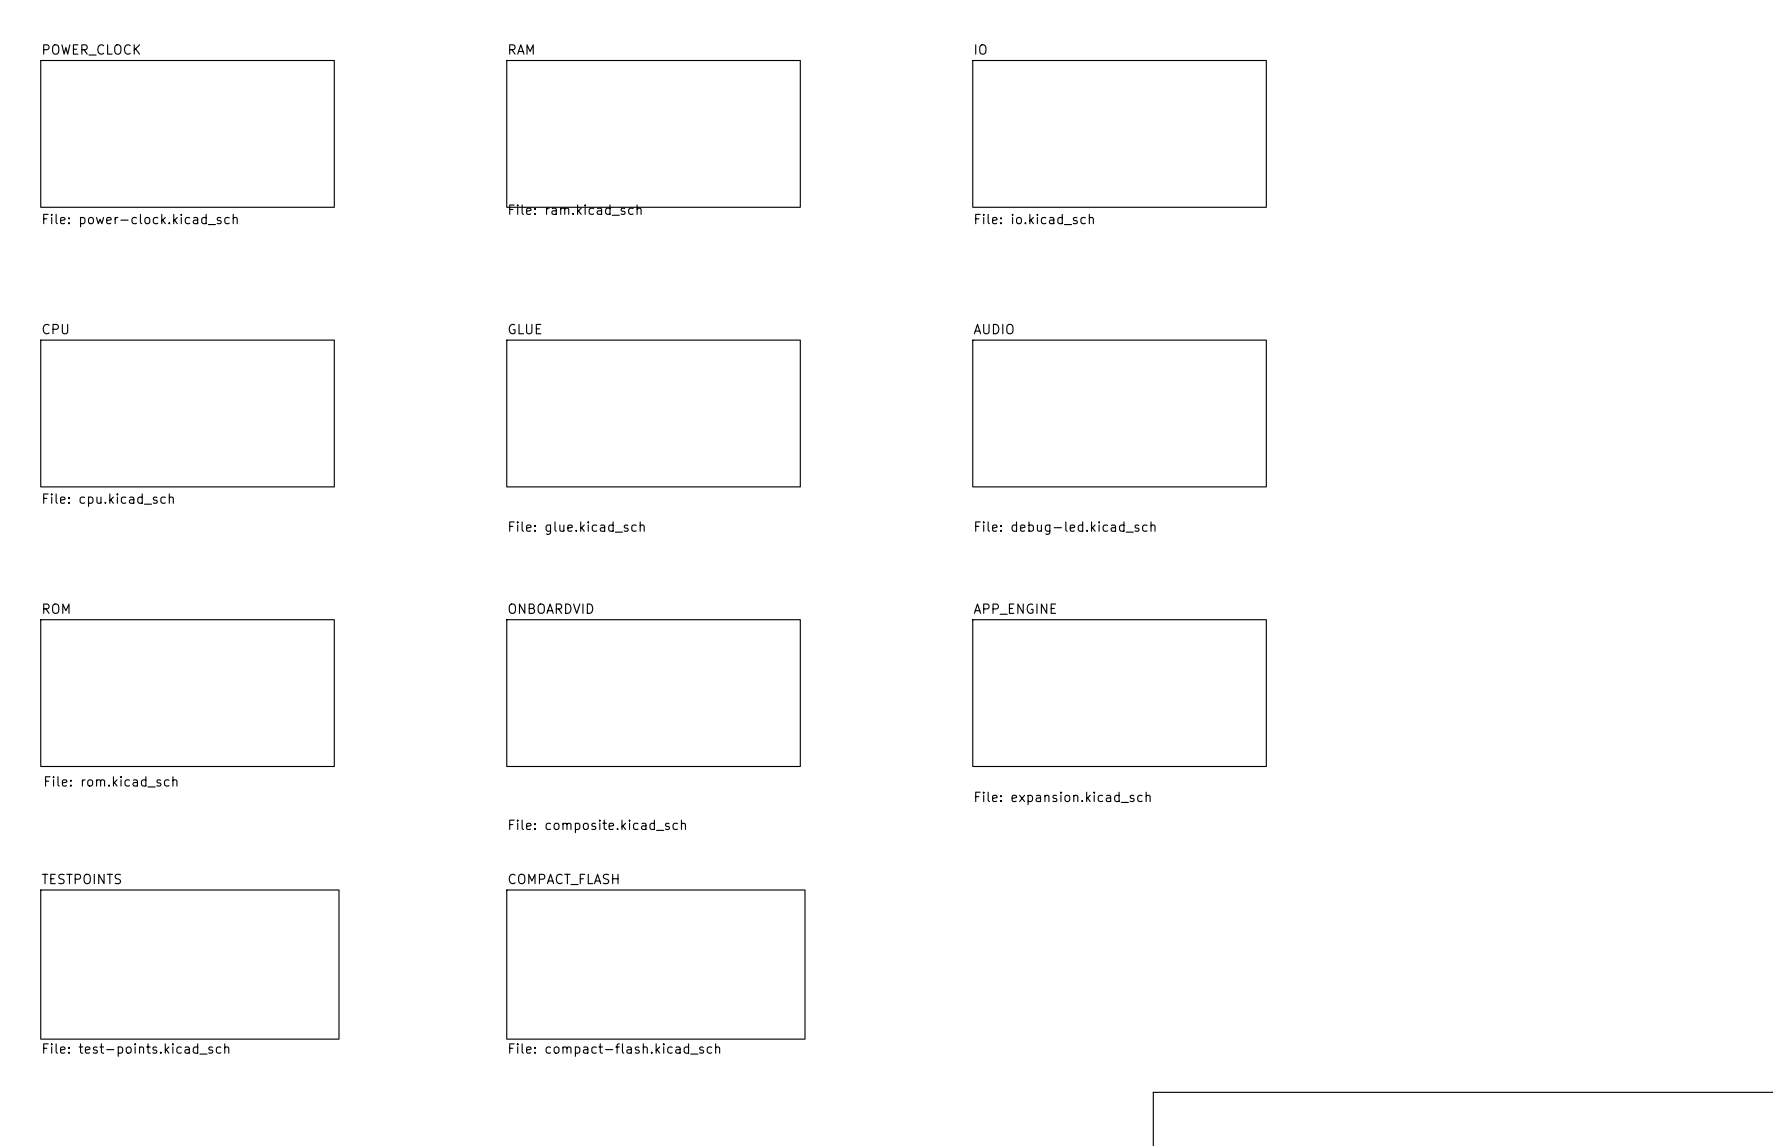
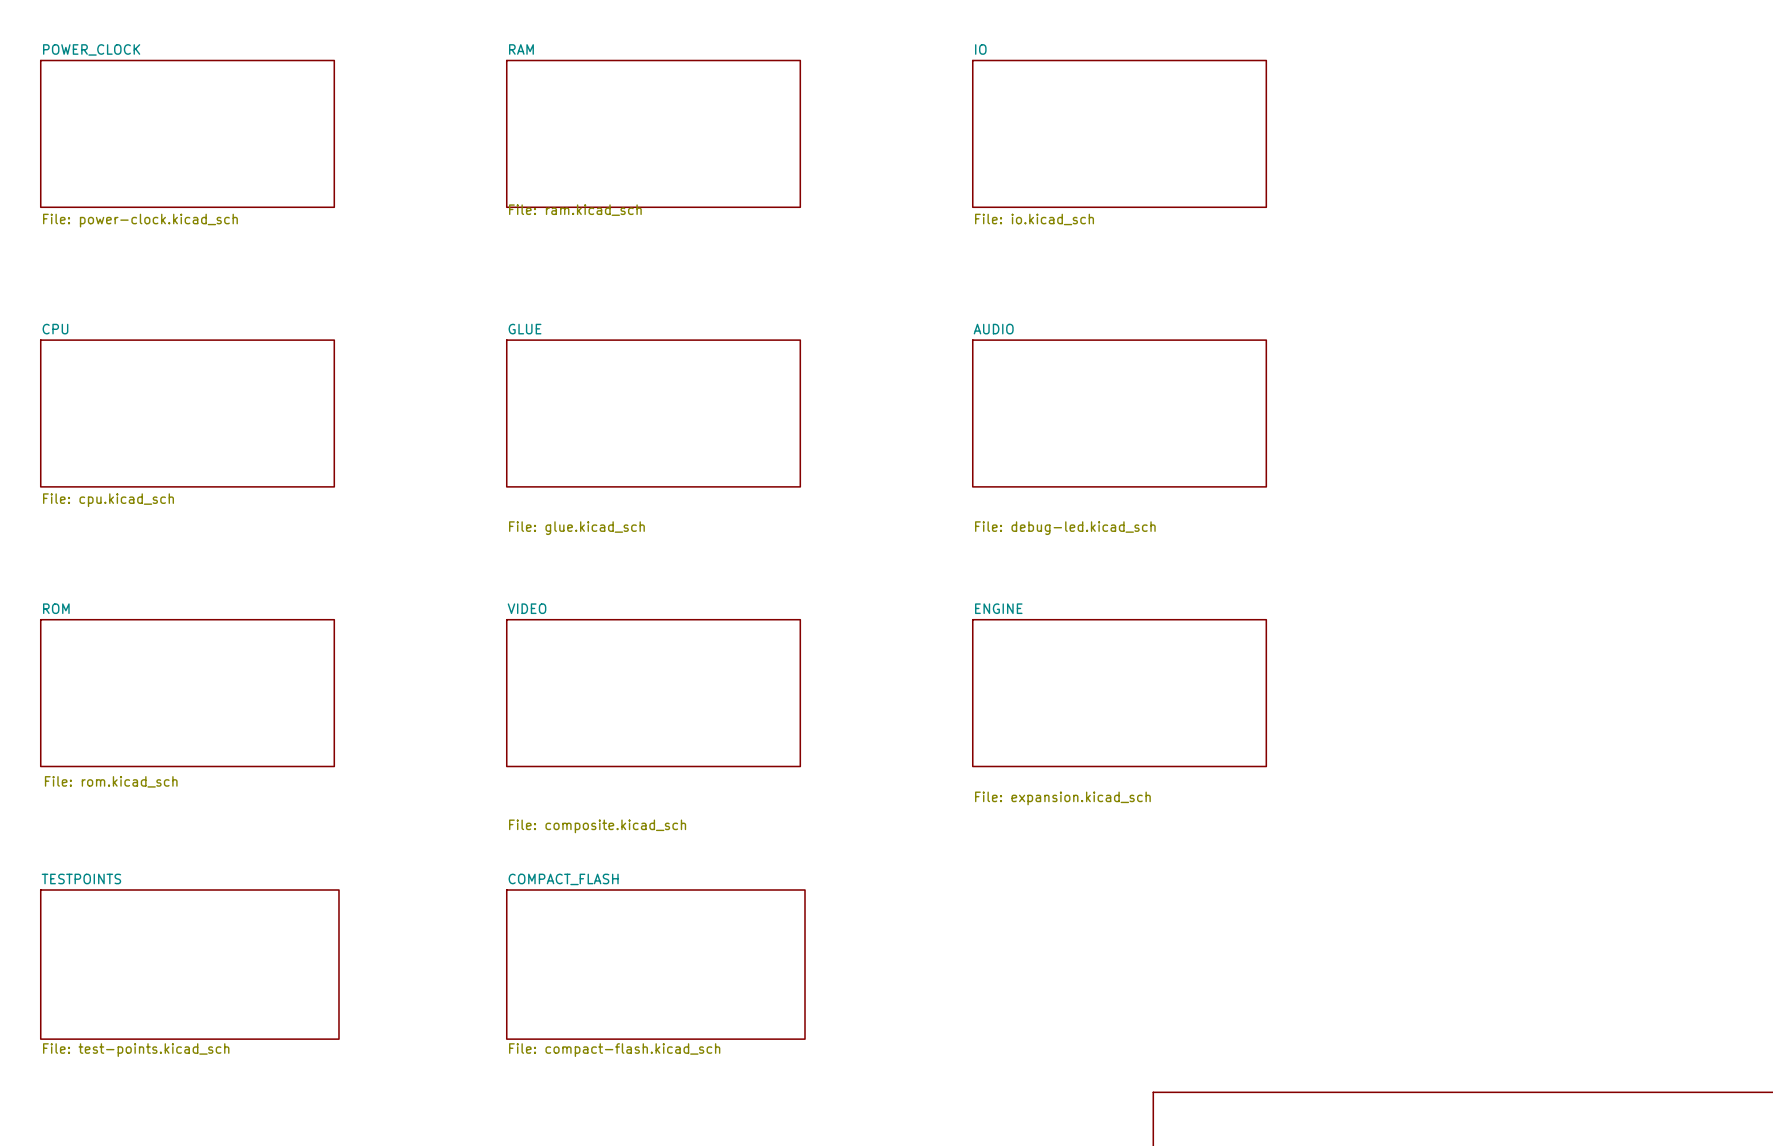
sheet ONBOARDVID name: ONBOARDVID (550, 608) -> VIDEO (527, 608)
sheet APP_ENGINE name: APP_ENGINE (1014, 609) -> ENGINE (998, 608)

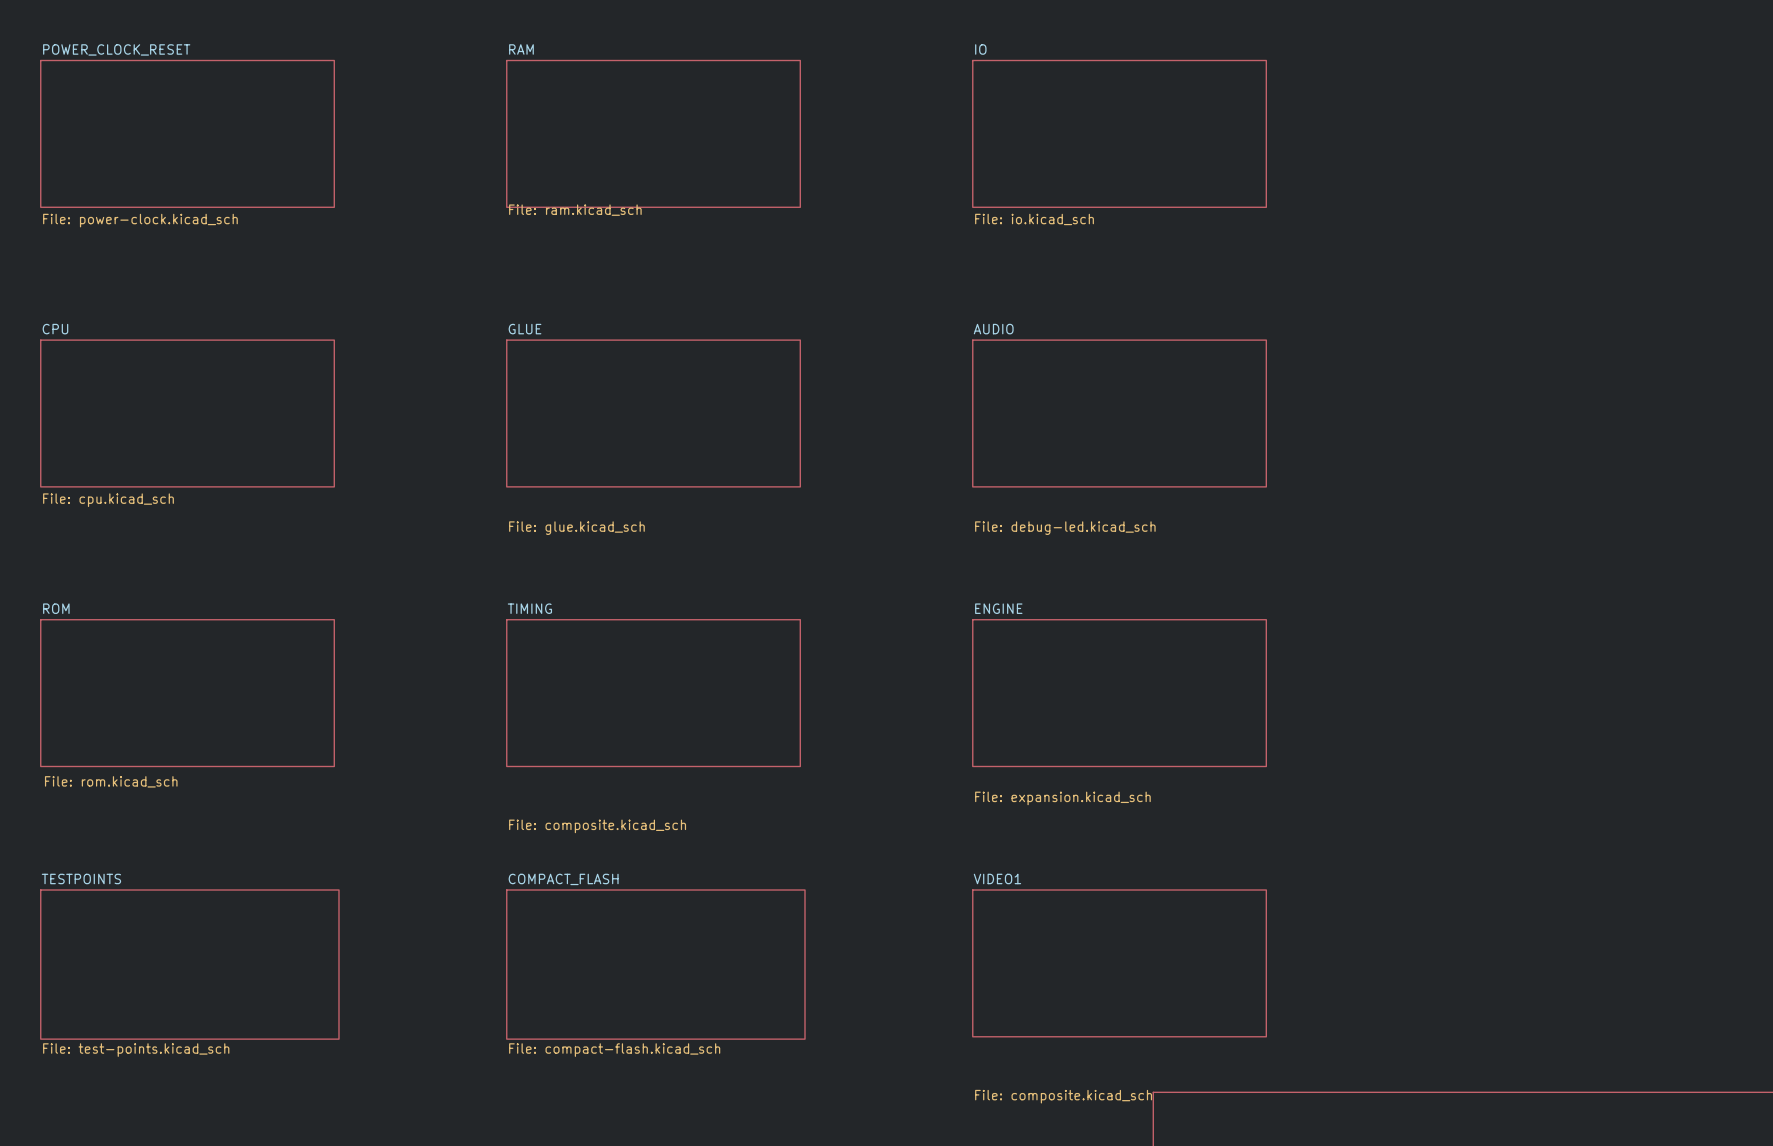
sheet POWER_CLOCK name: POWER_CLOCK (91, 49) -> POWER_CLOCK_RESET (116, 49)
sheet VIDEO name: VIDEO (527, 608) -> TIMING (529, 608)
sheet VIDEO1: none -> File: composite.kicad_sch (1119, 963)

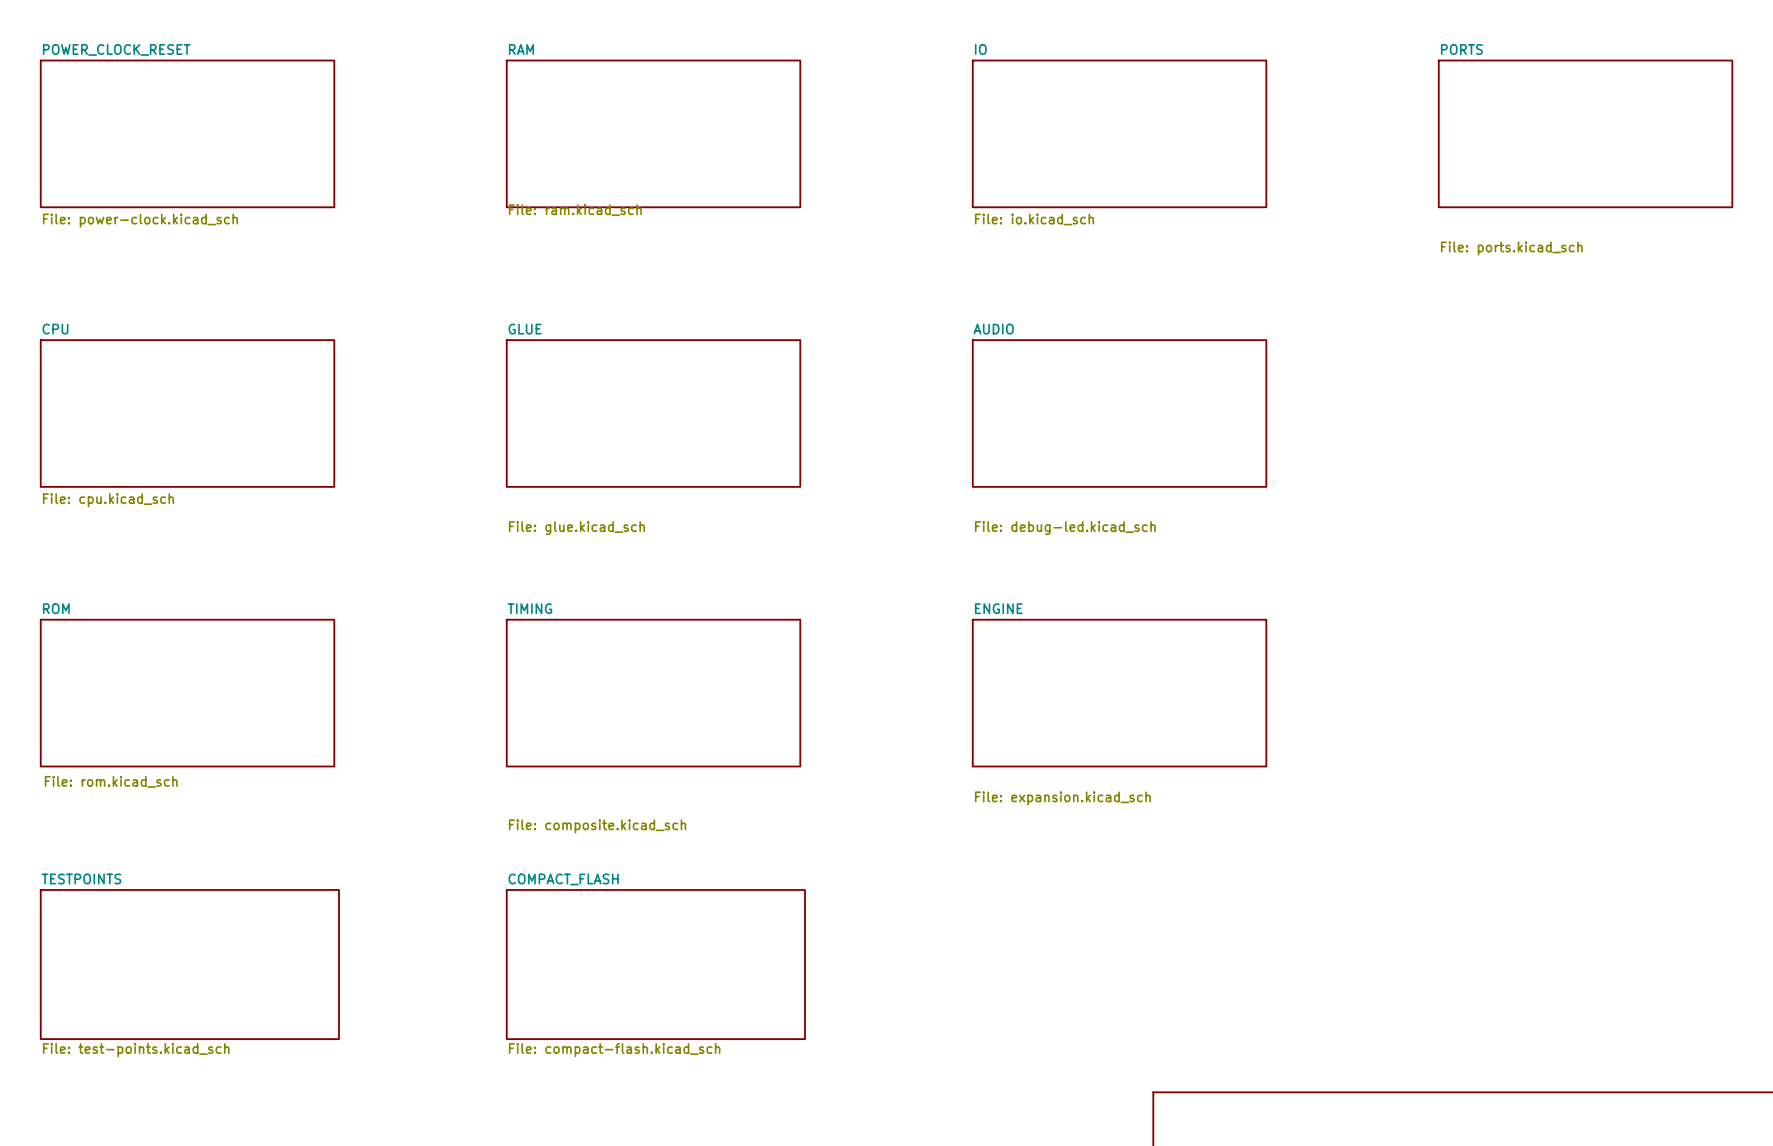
sheet PORTS: none -> File: ports.kicad_sch (1585, 133)
sheet VIDEO1: File: composite.kicad_sch (1119, 963) -> none

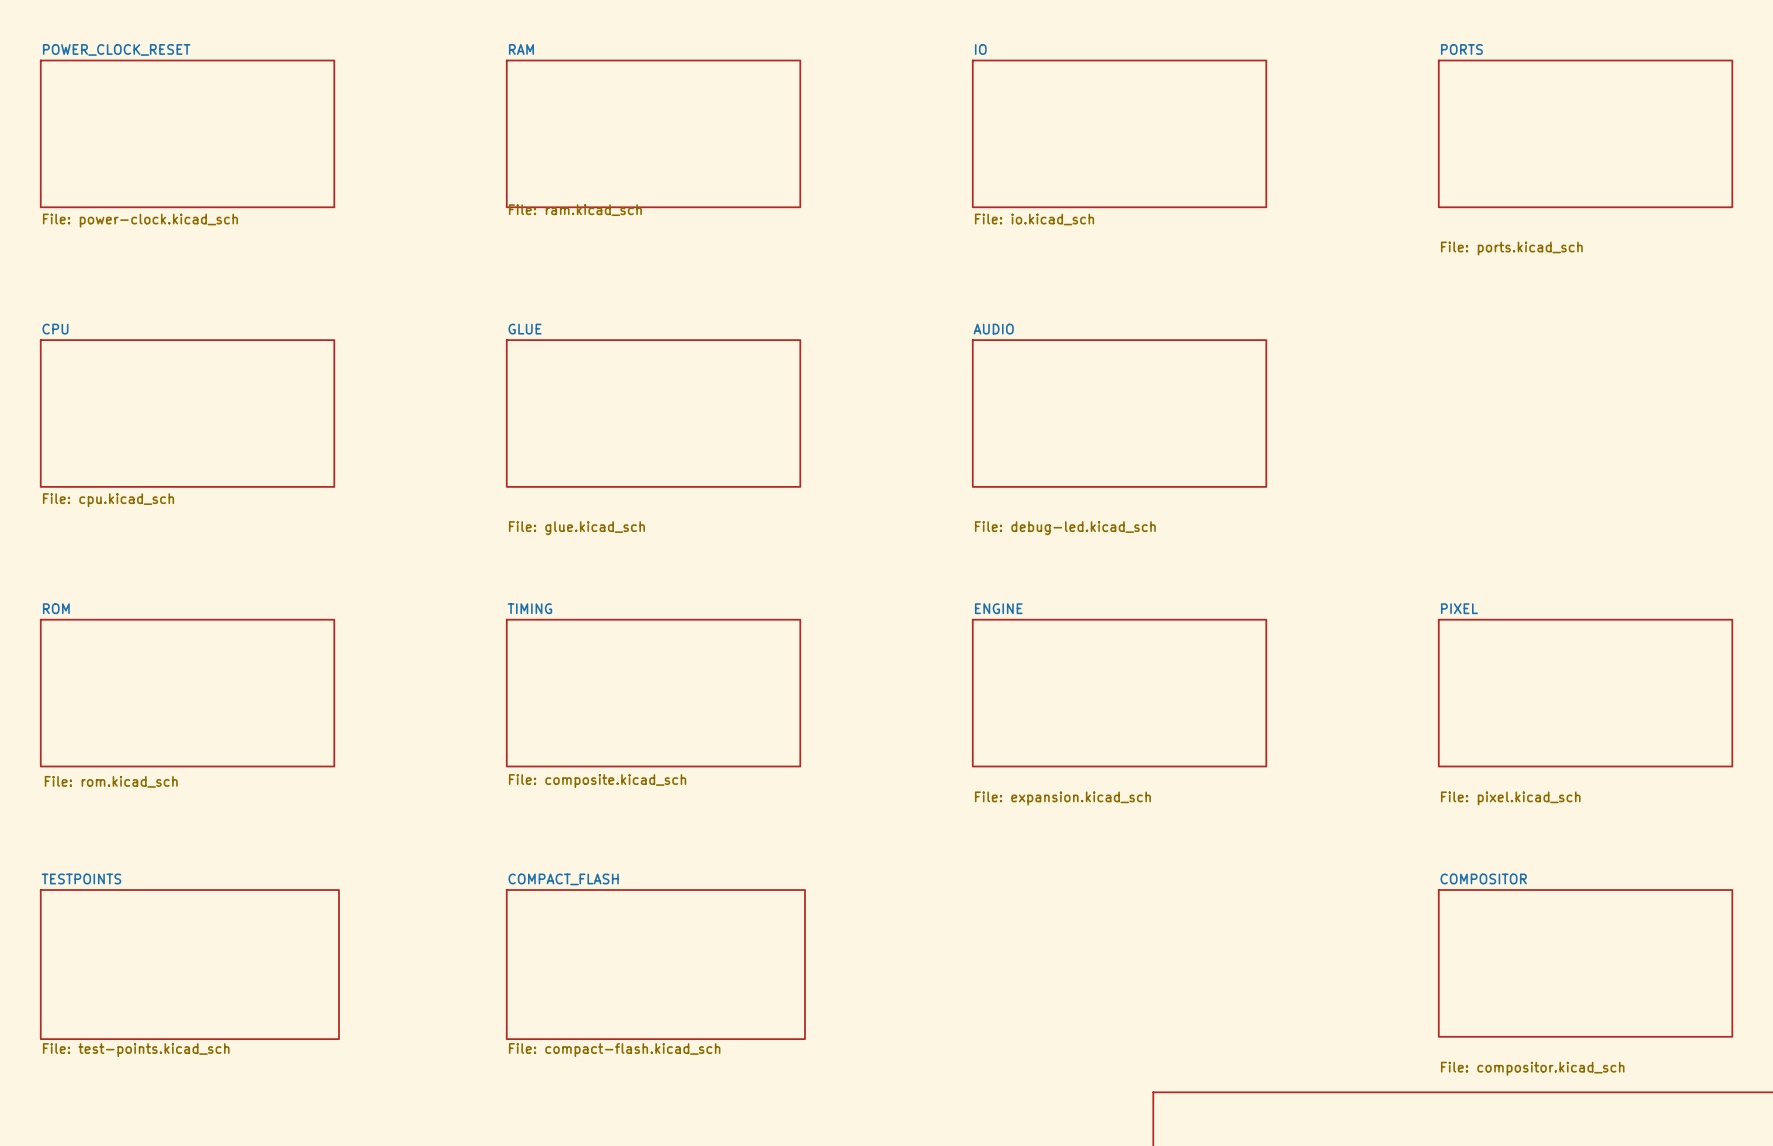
sheet PIXEL: none -> File: pixel.kicad_sch (1585, 693)
sheet TIMING value position: File: composite.kicad_sch (597, 826) -> File: composite.kicad_sch (597, 781)
sheet COMPOSITOR: none -> File: compositor.kicad_sch (1585, 963)

